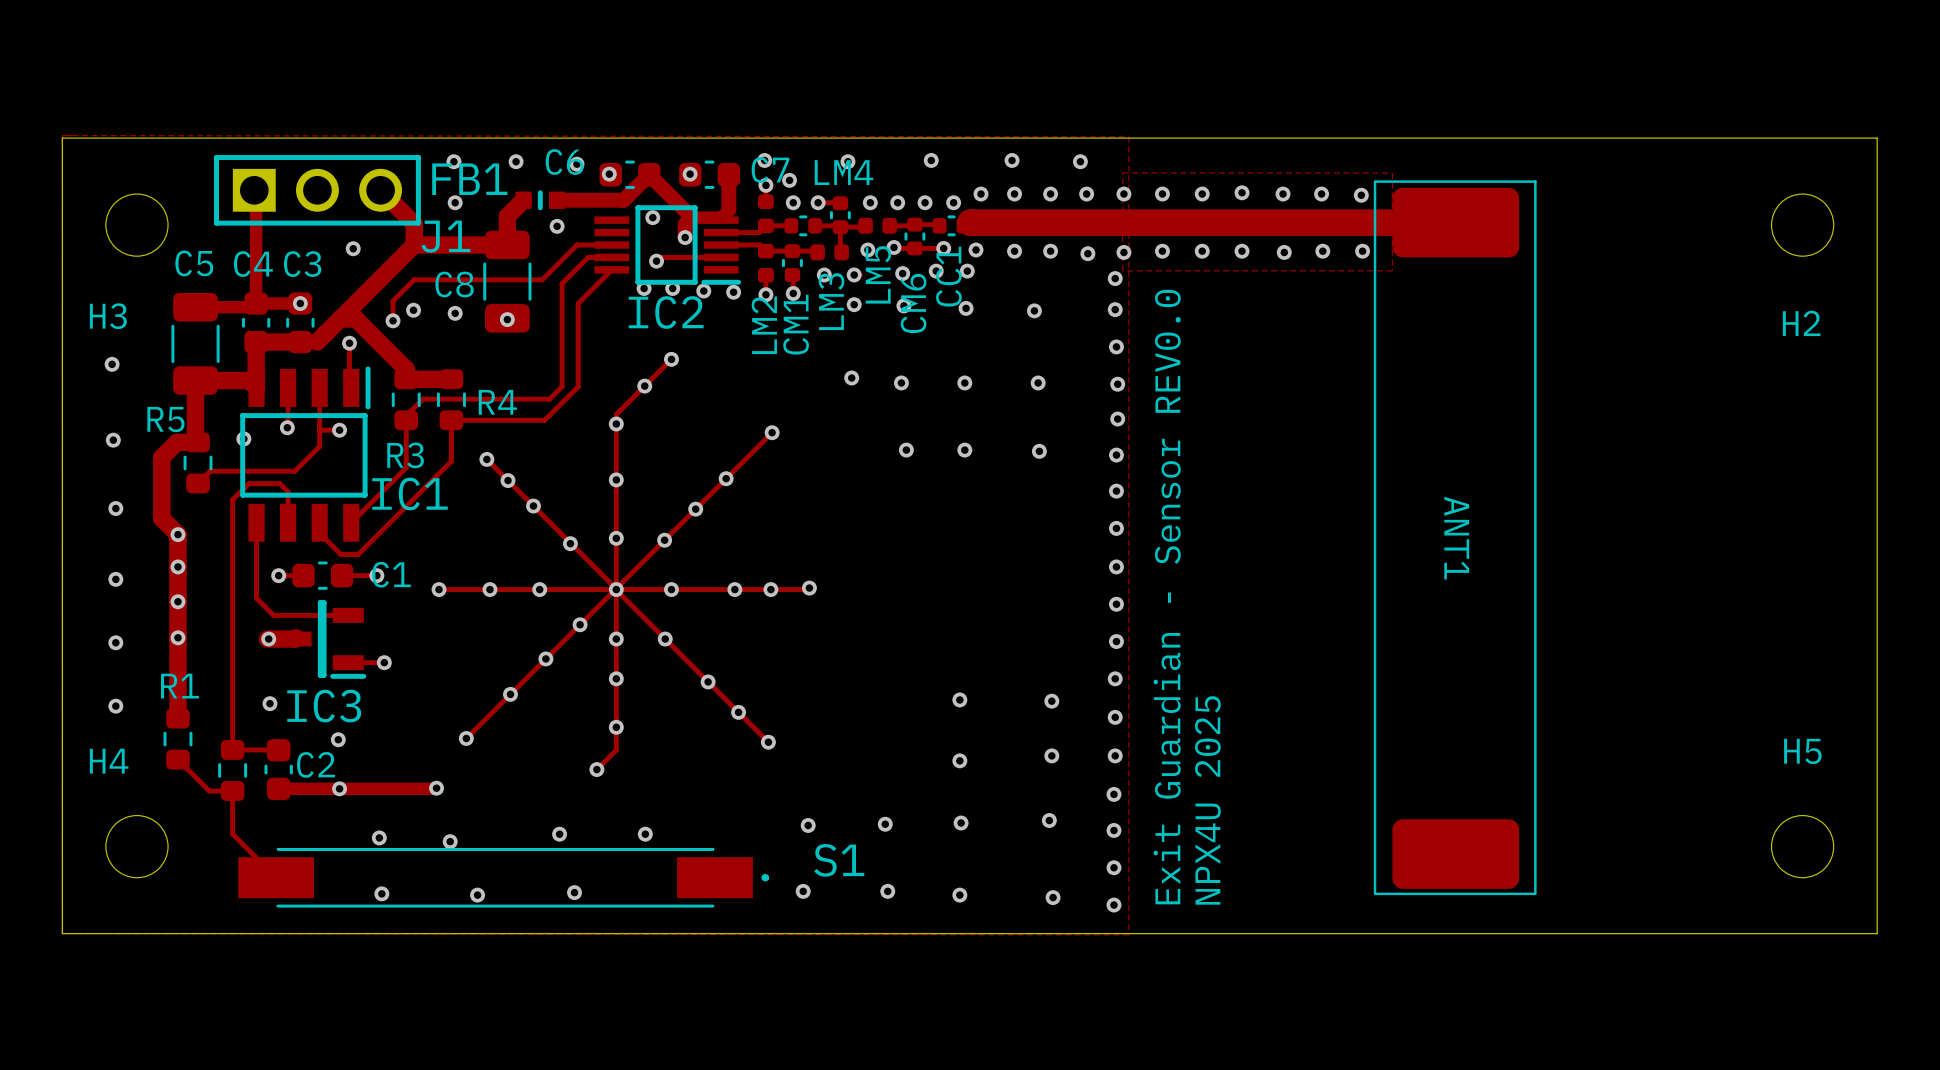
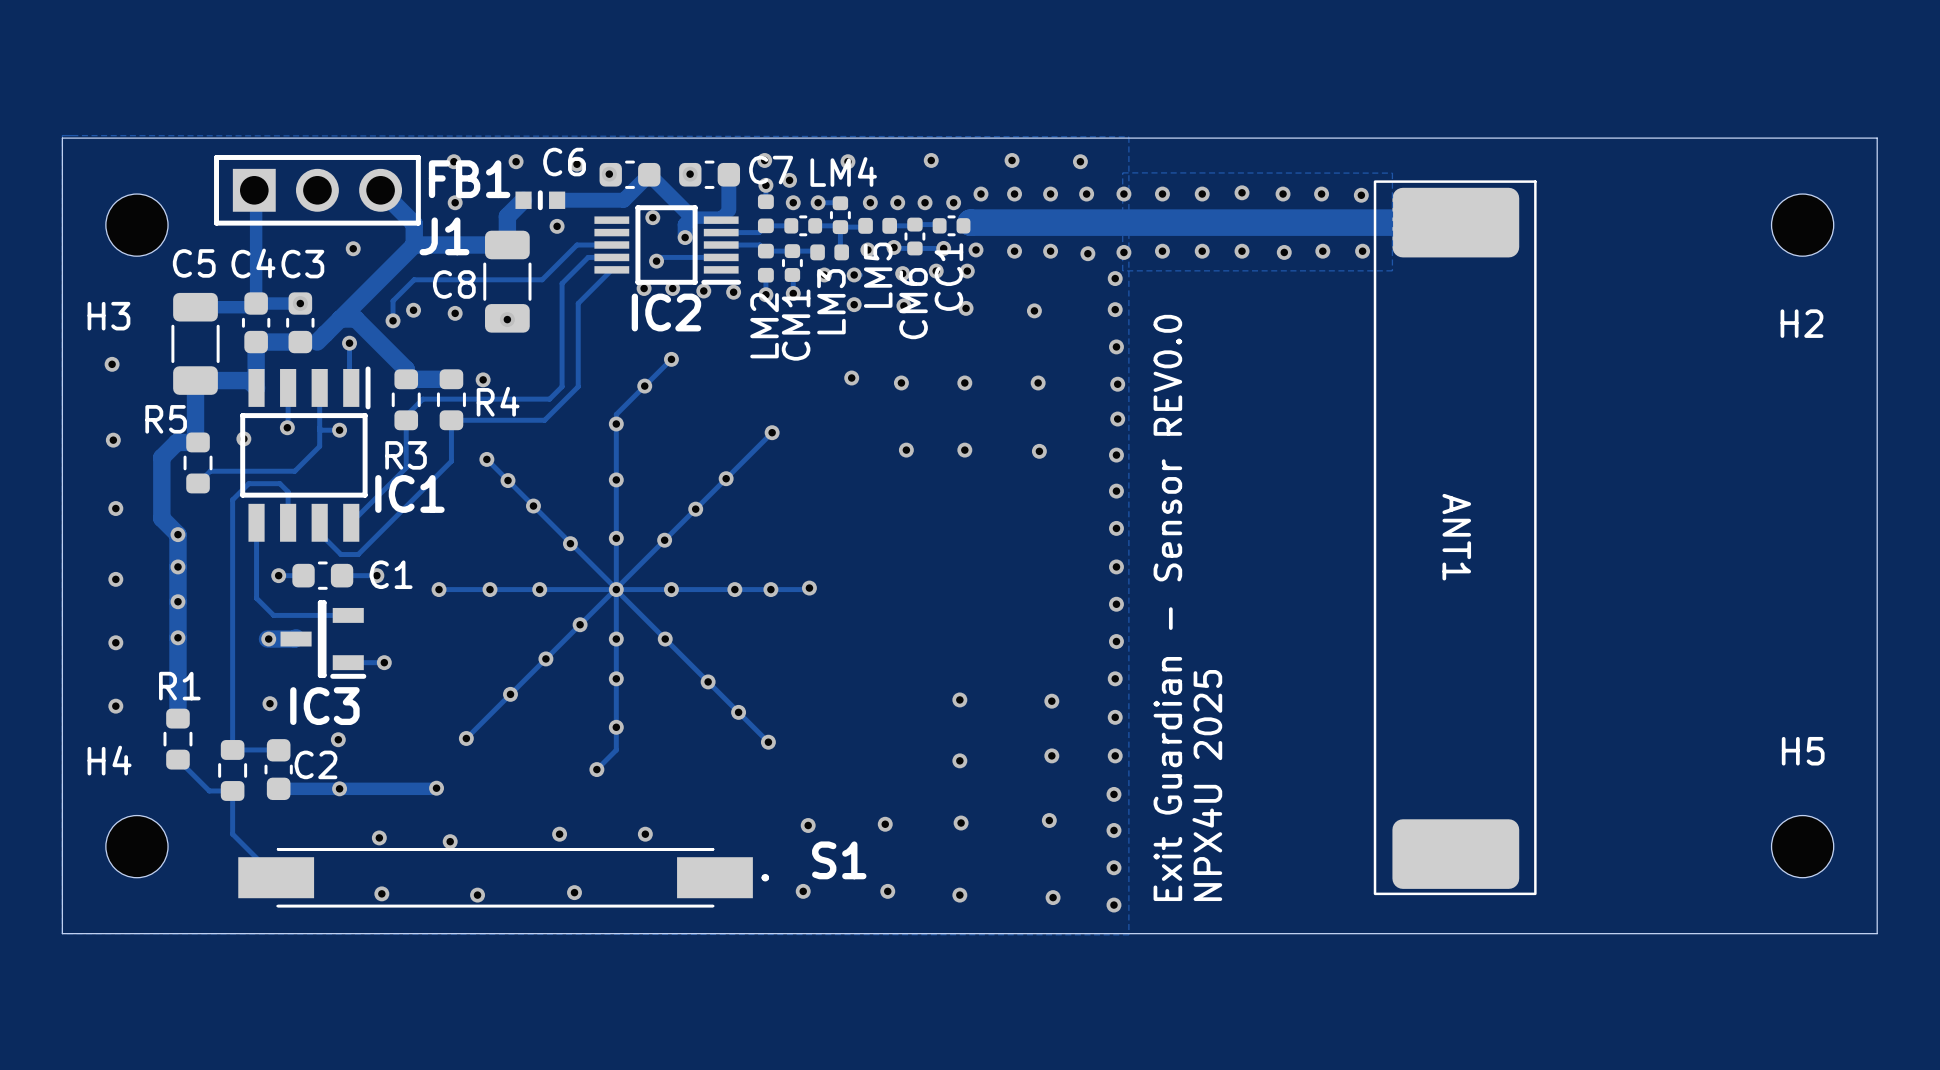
via: none -> (483, 379)

